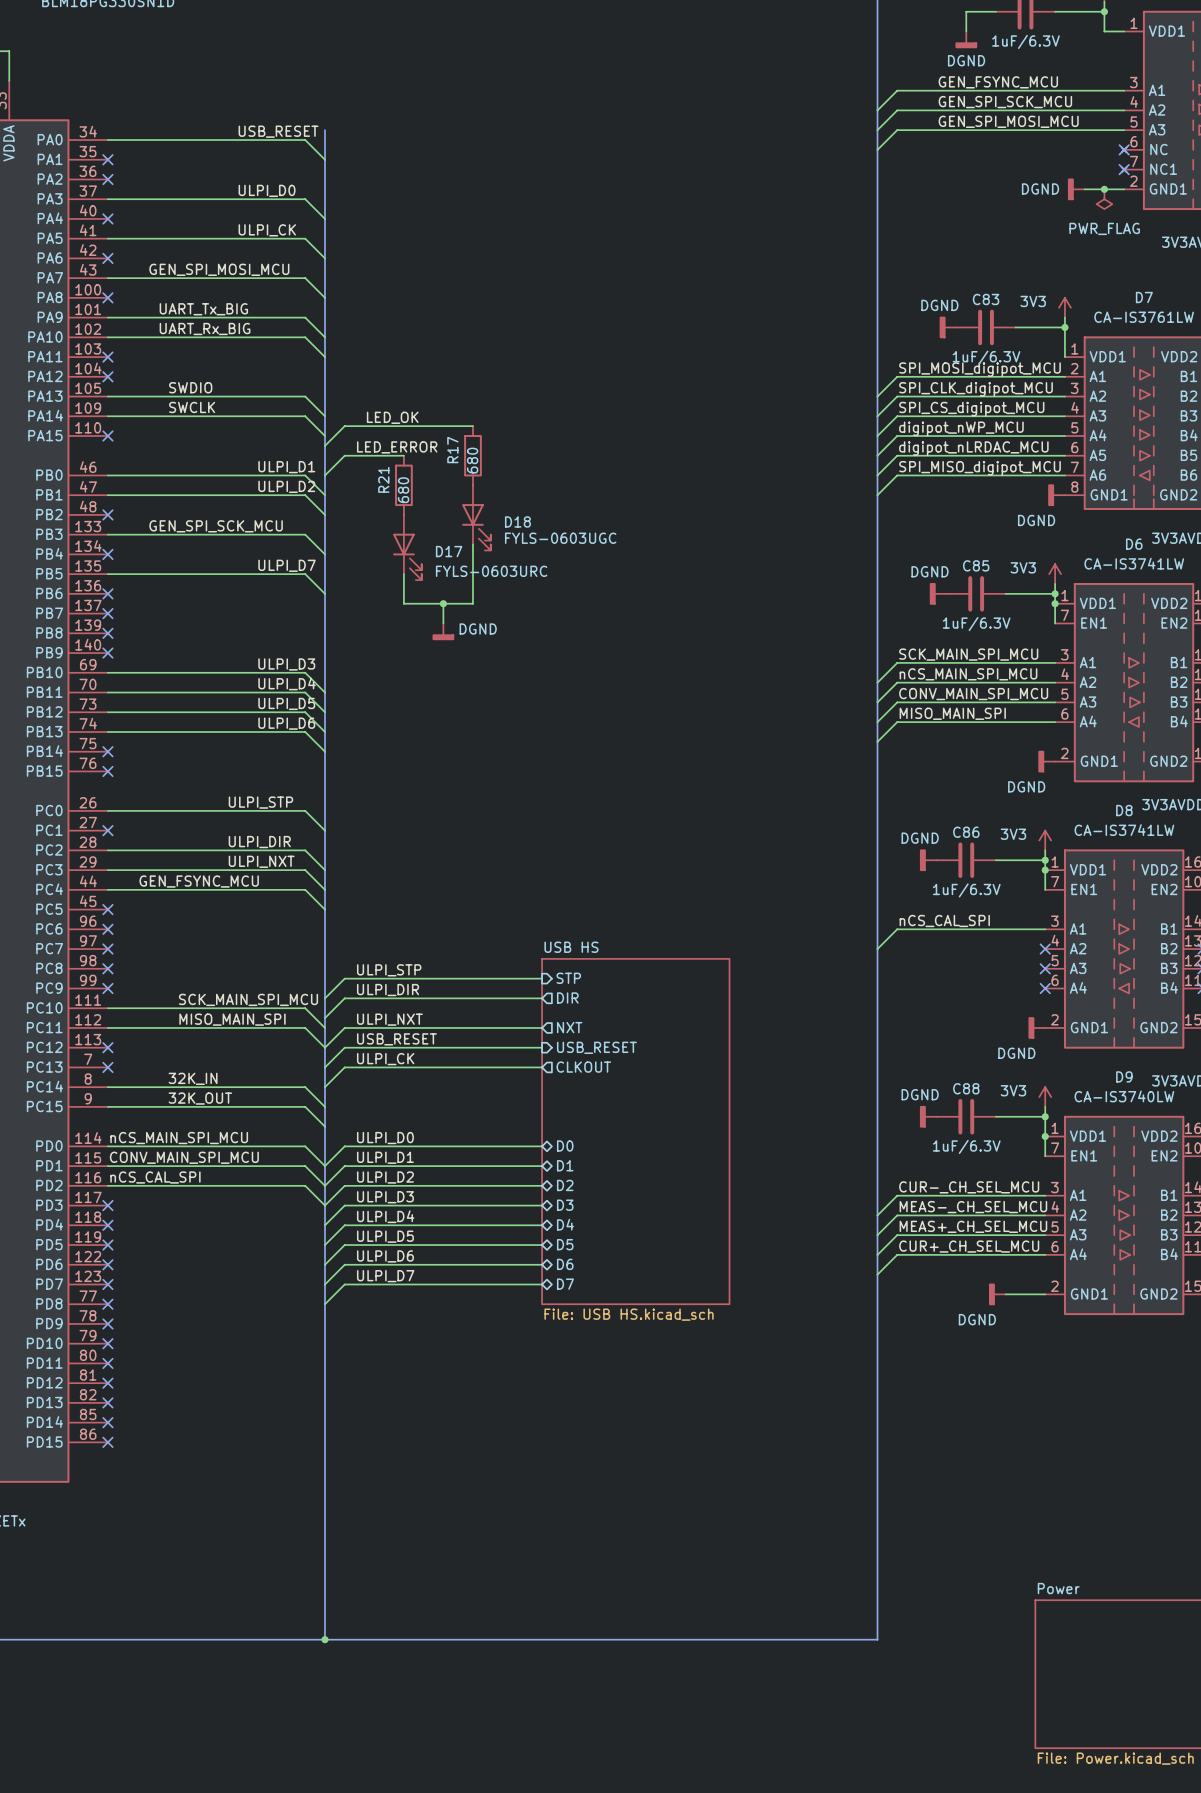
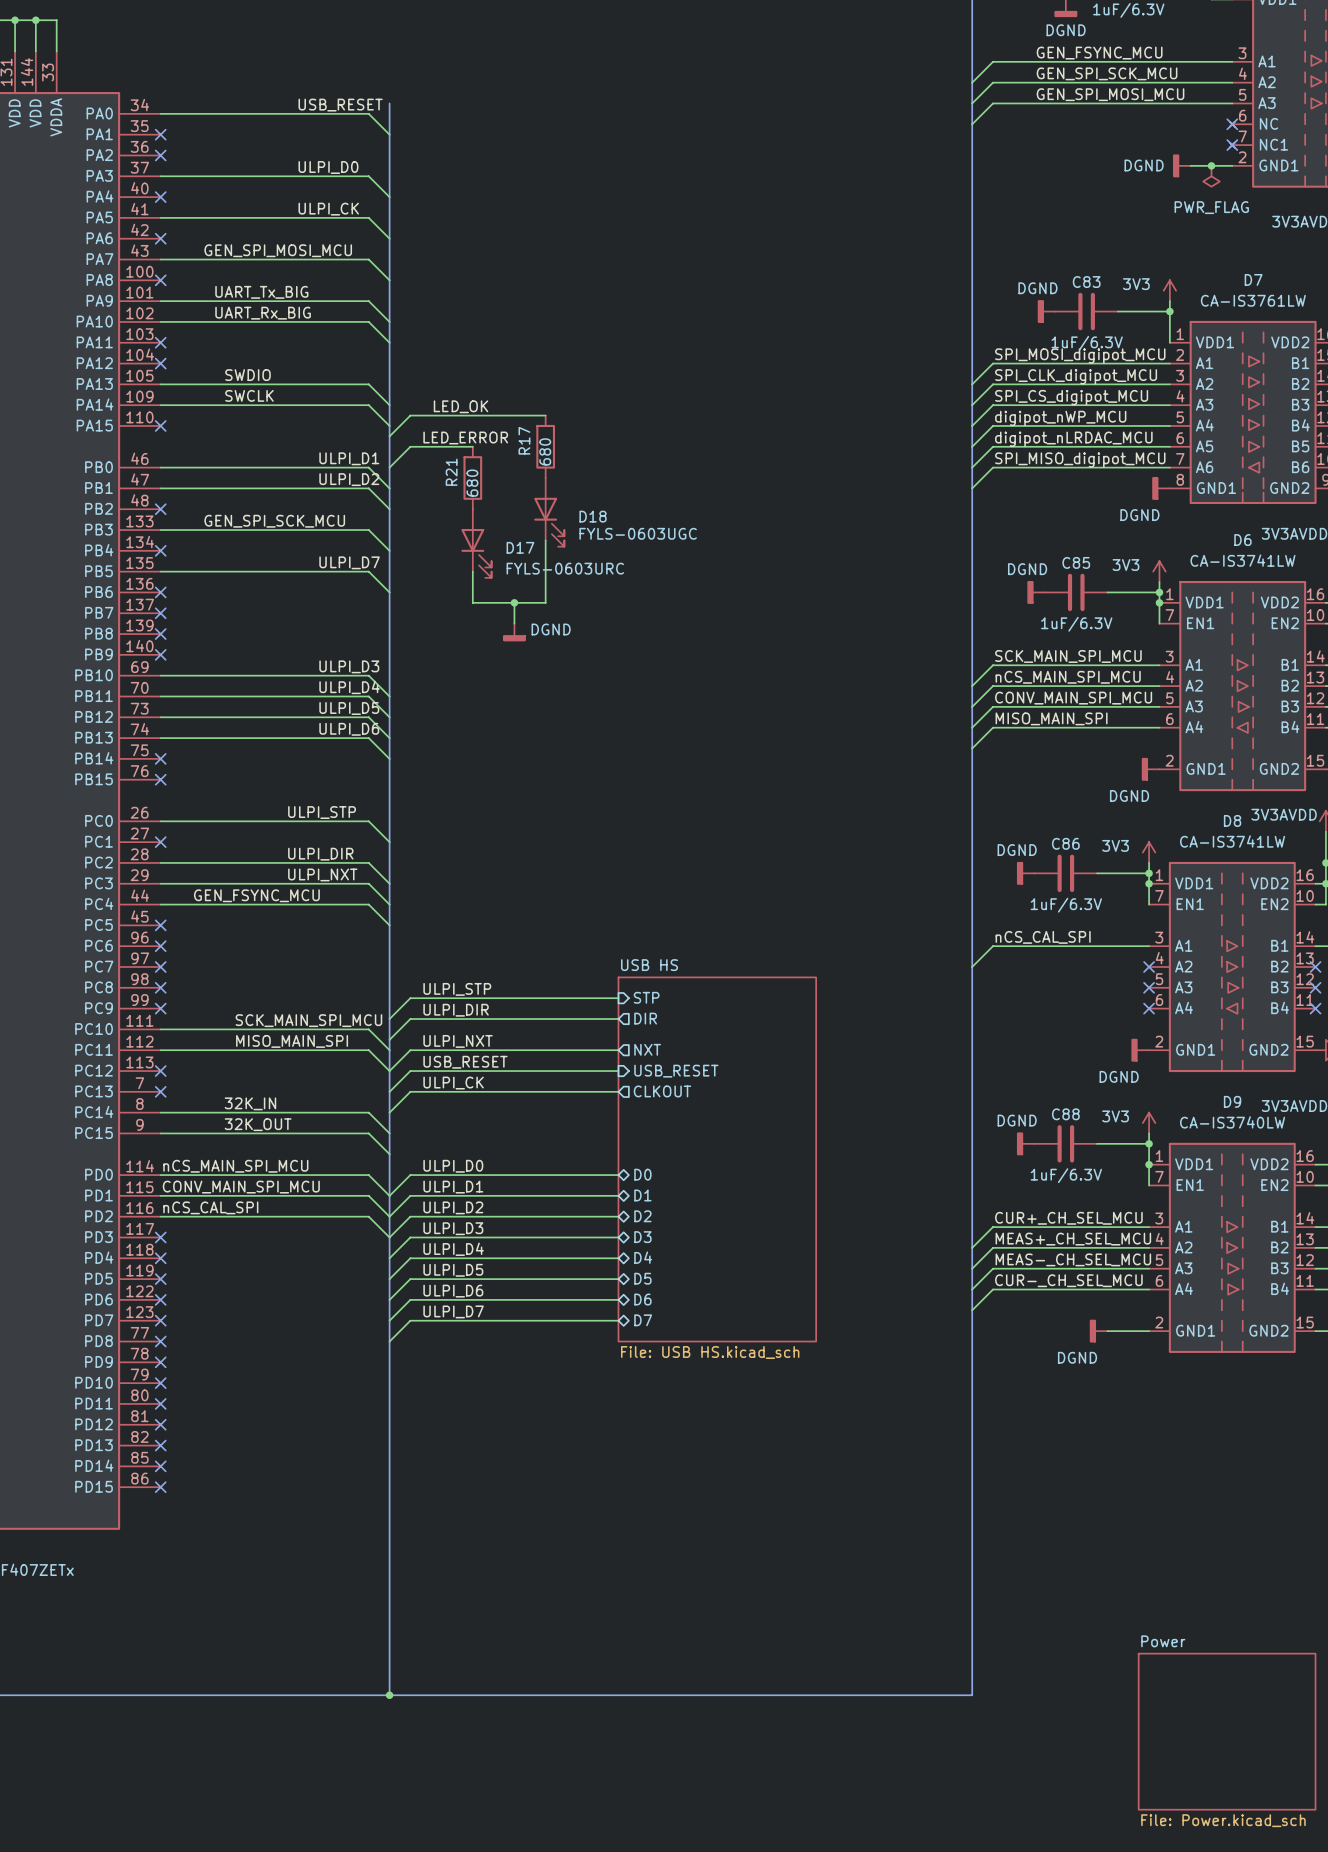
label: CUR-_CH_SEL_MCU (969, 1187) -> CUR+_CH_SEL_MCU (1068, 1218)
label: MEAS-_CH_SEL_MCU (973, 1207) -> MEAS+_CH_SEL_MCU (1073, 1239)
label: MEAS+_CH_SEL_MCU (973, 1226) -> MEAS-_CH_SEL_MCU (1073, 1259)
label: CUR+_CH_SEL_MCU (969, 1246) -> CUR-_CH_SEL_MCU (1068, 1280)

